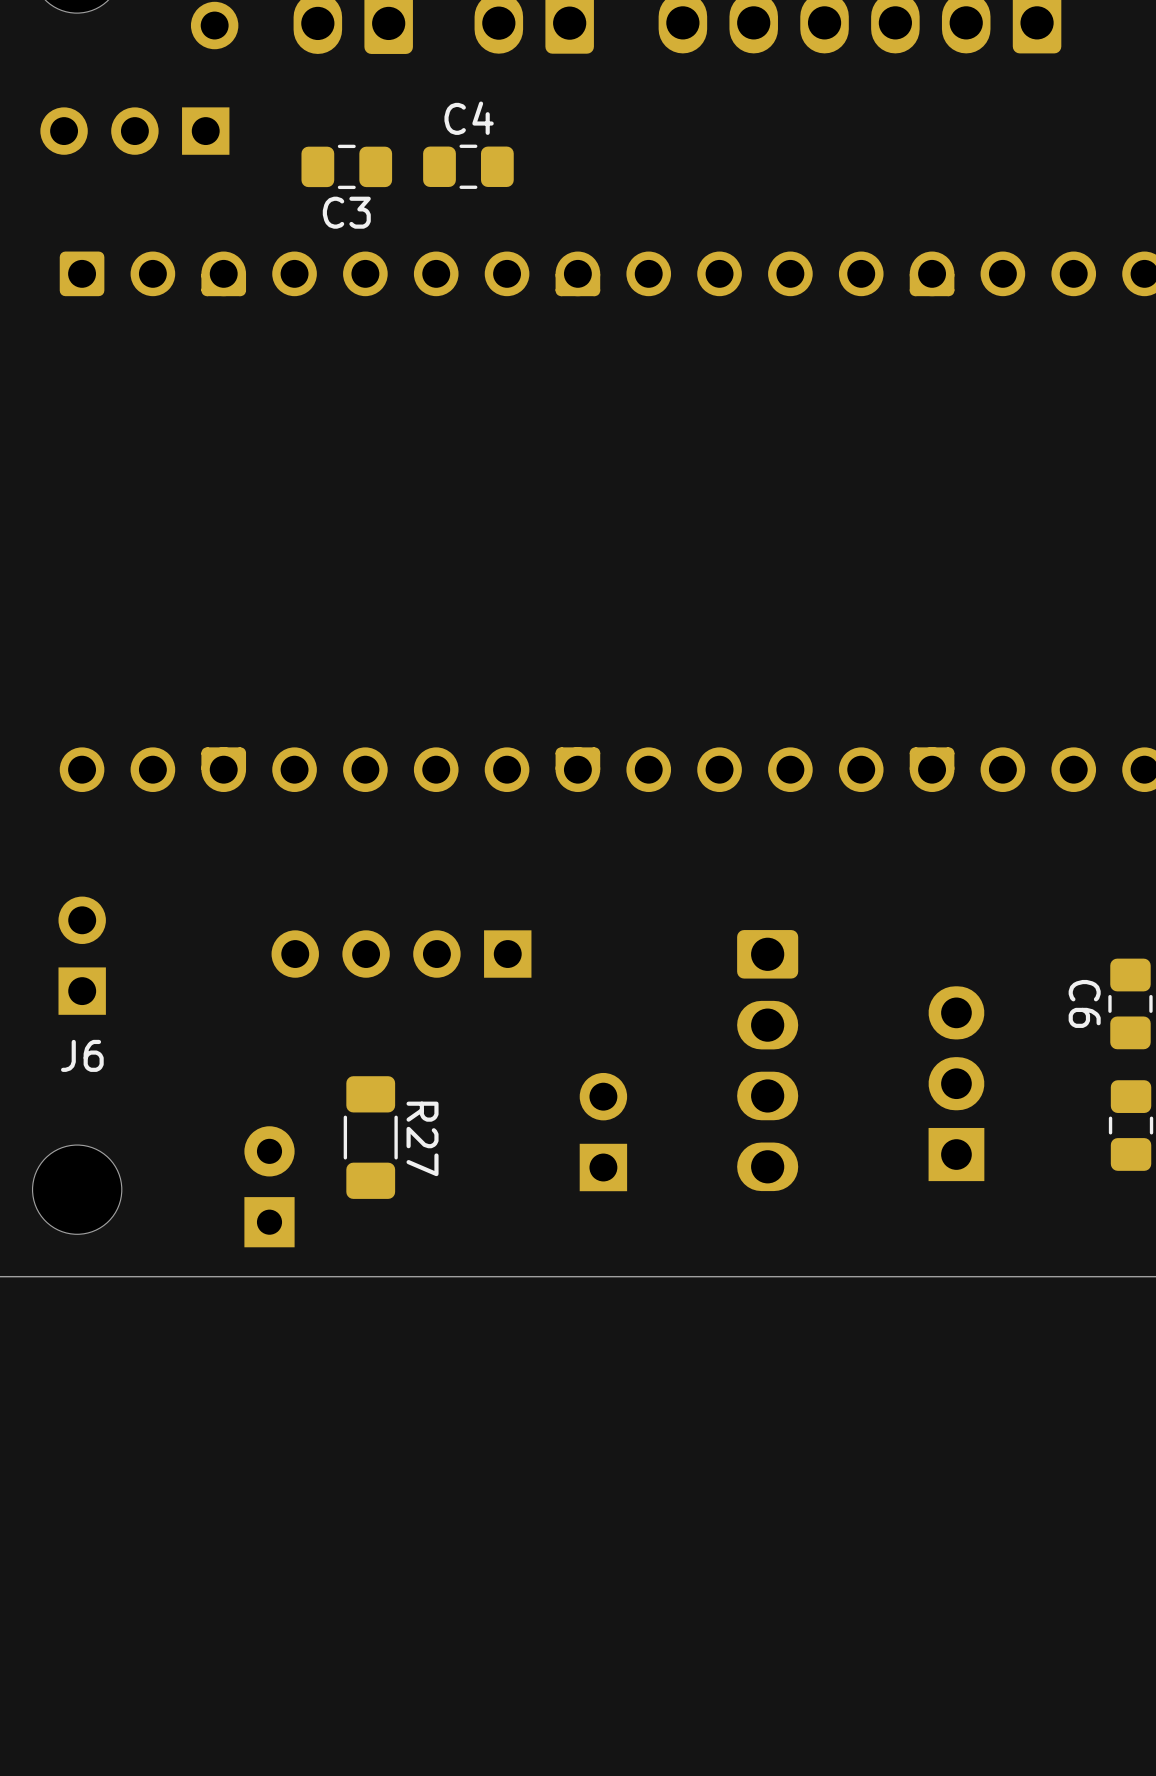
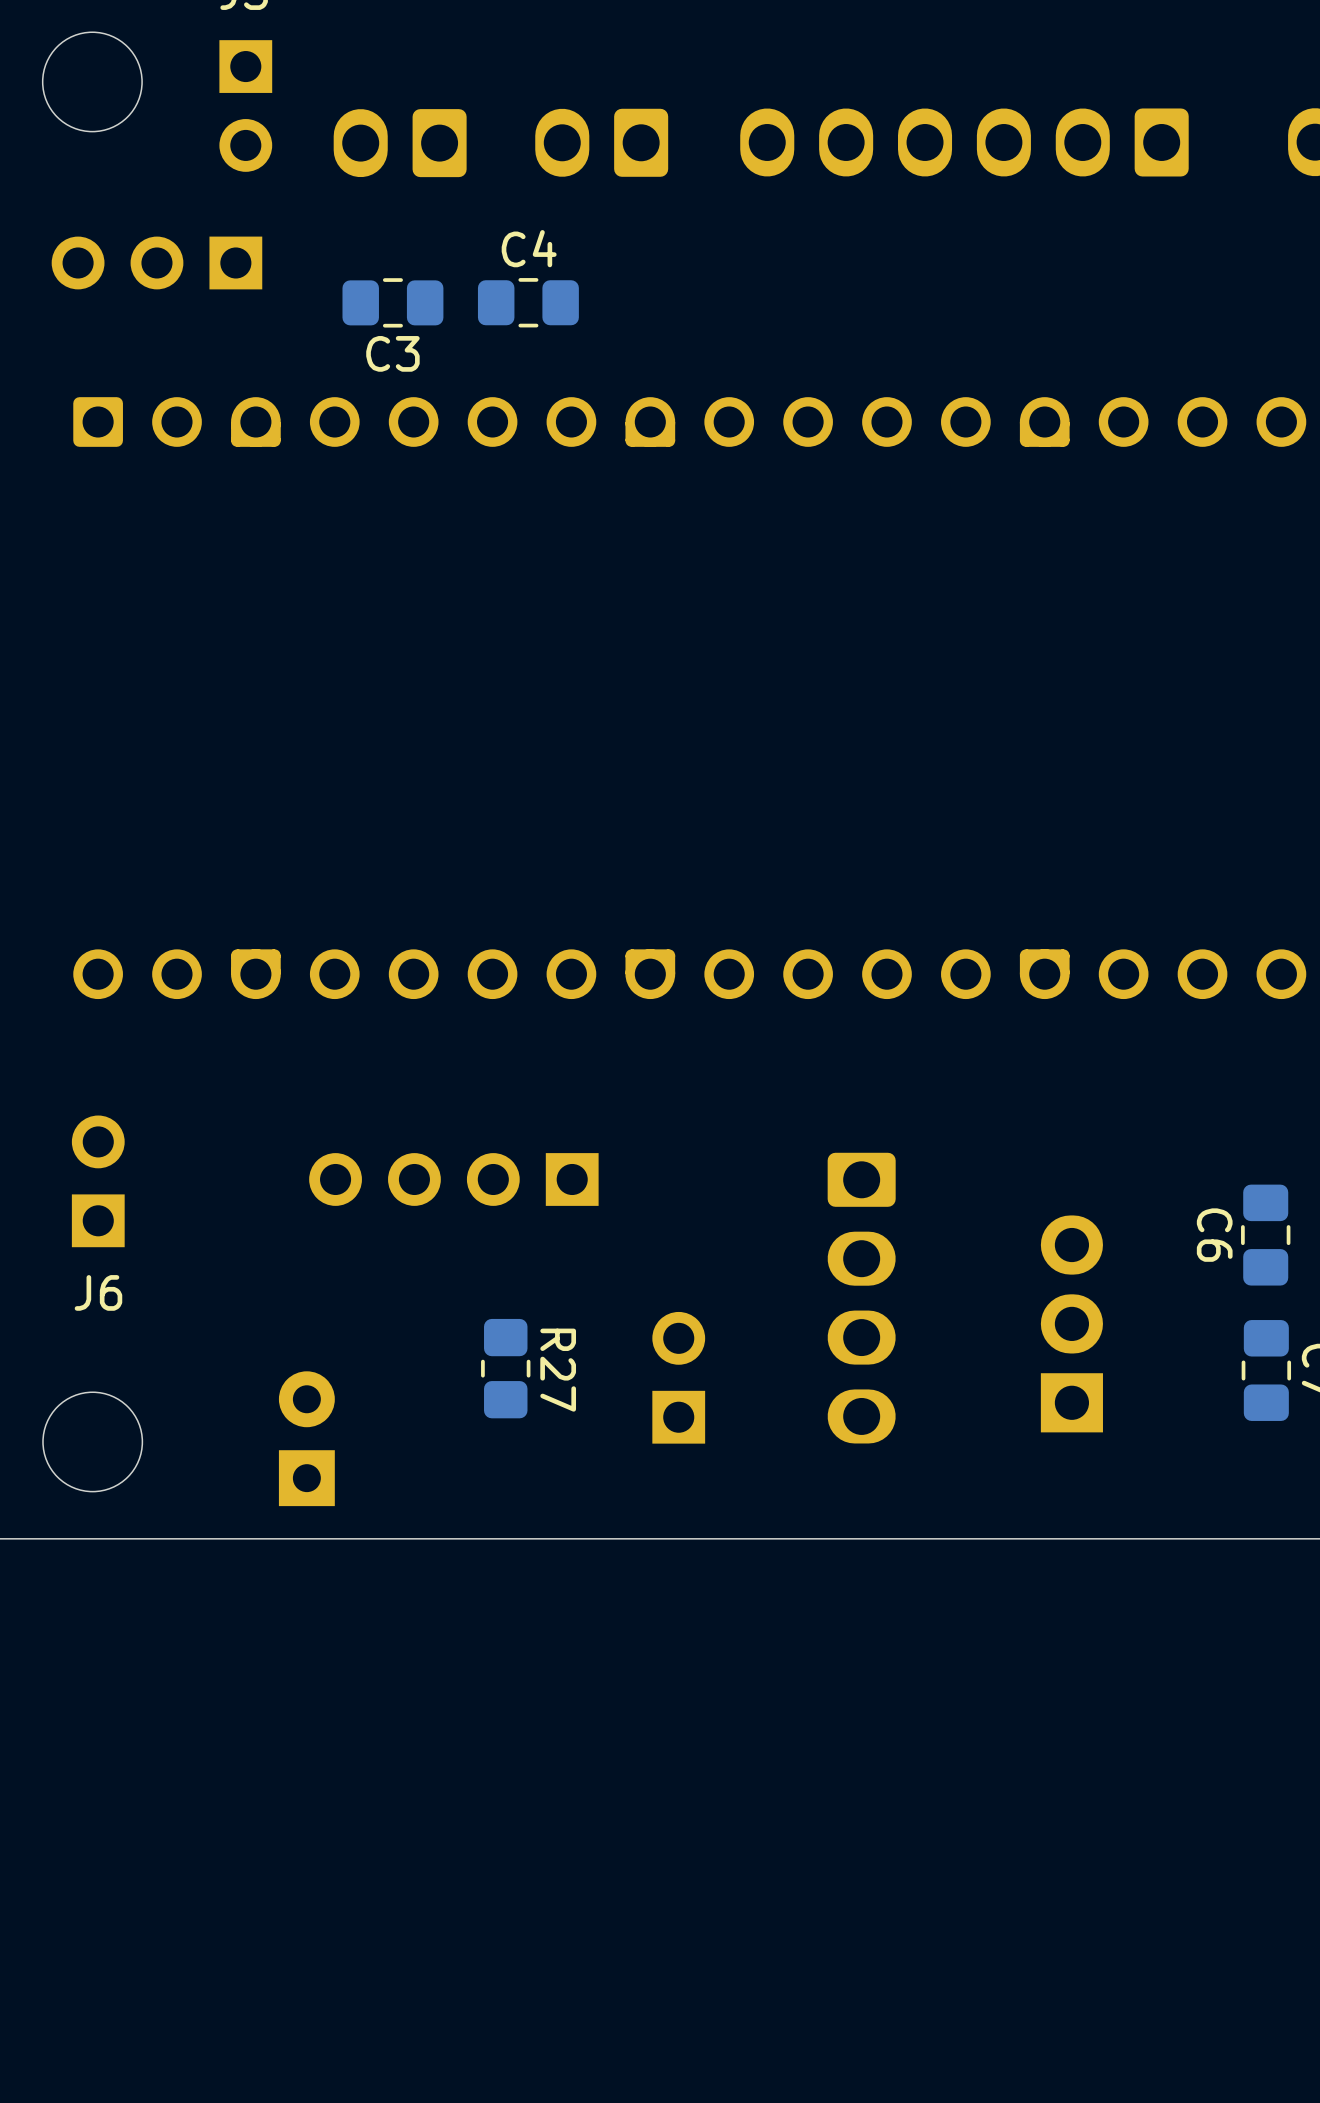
R27 footprint: [343, 1076, 398, 1199] -> [481, 1318, 531, 1419]

